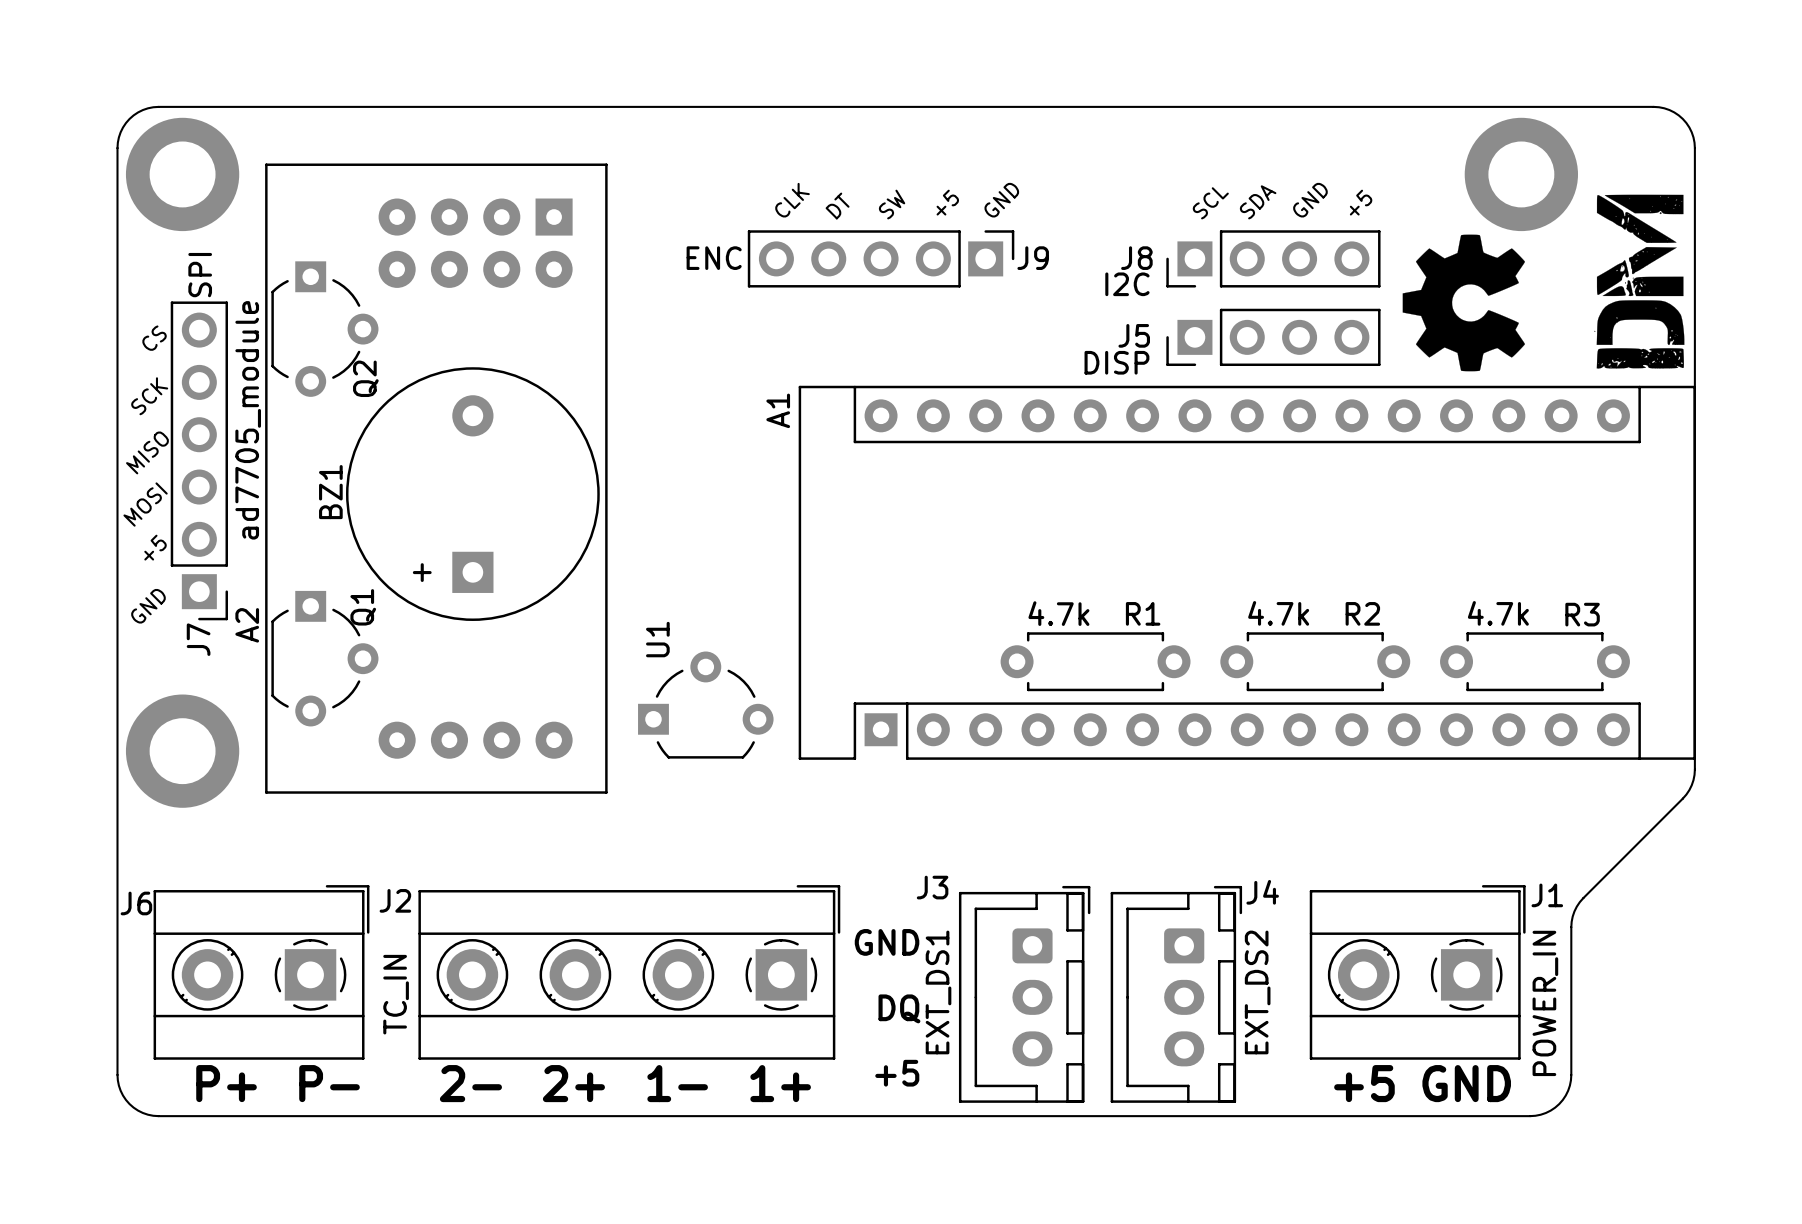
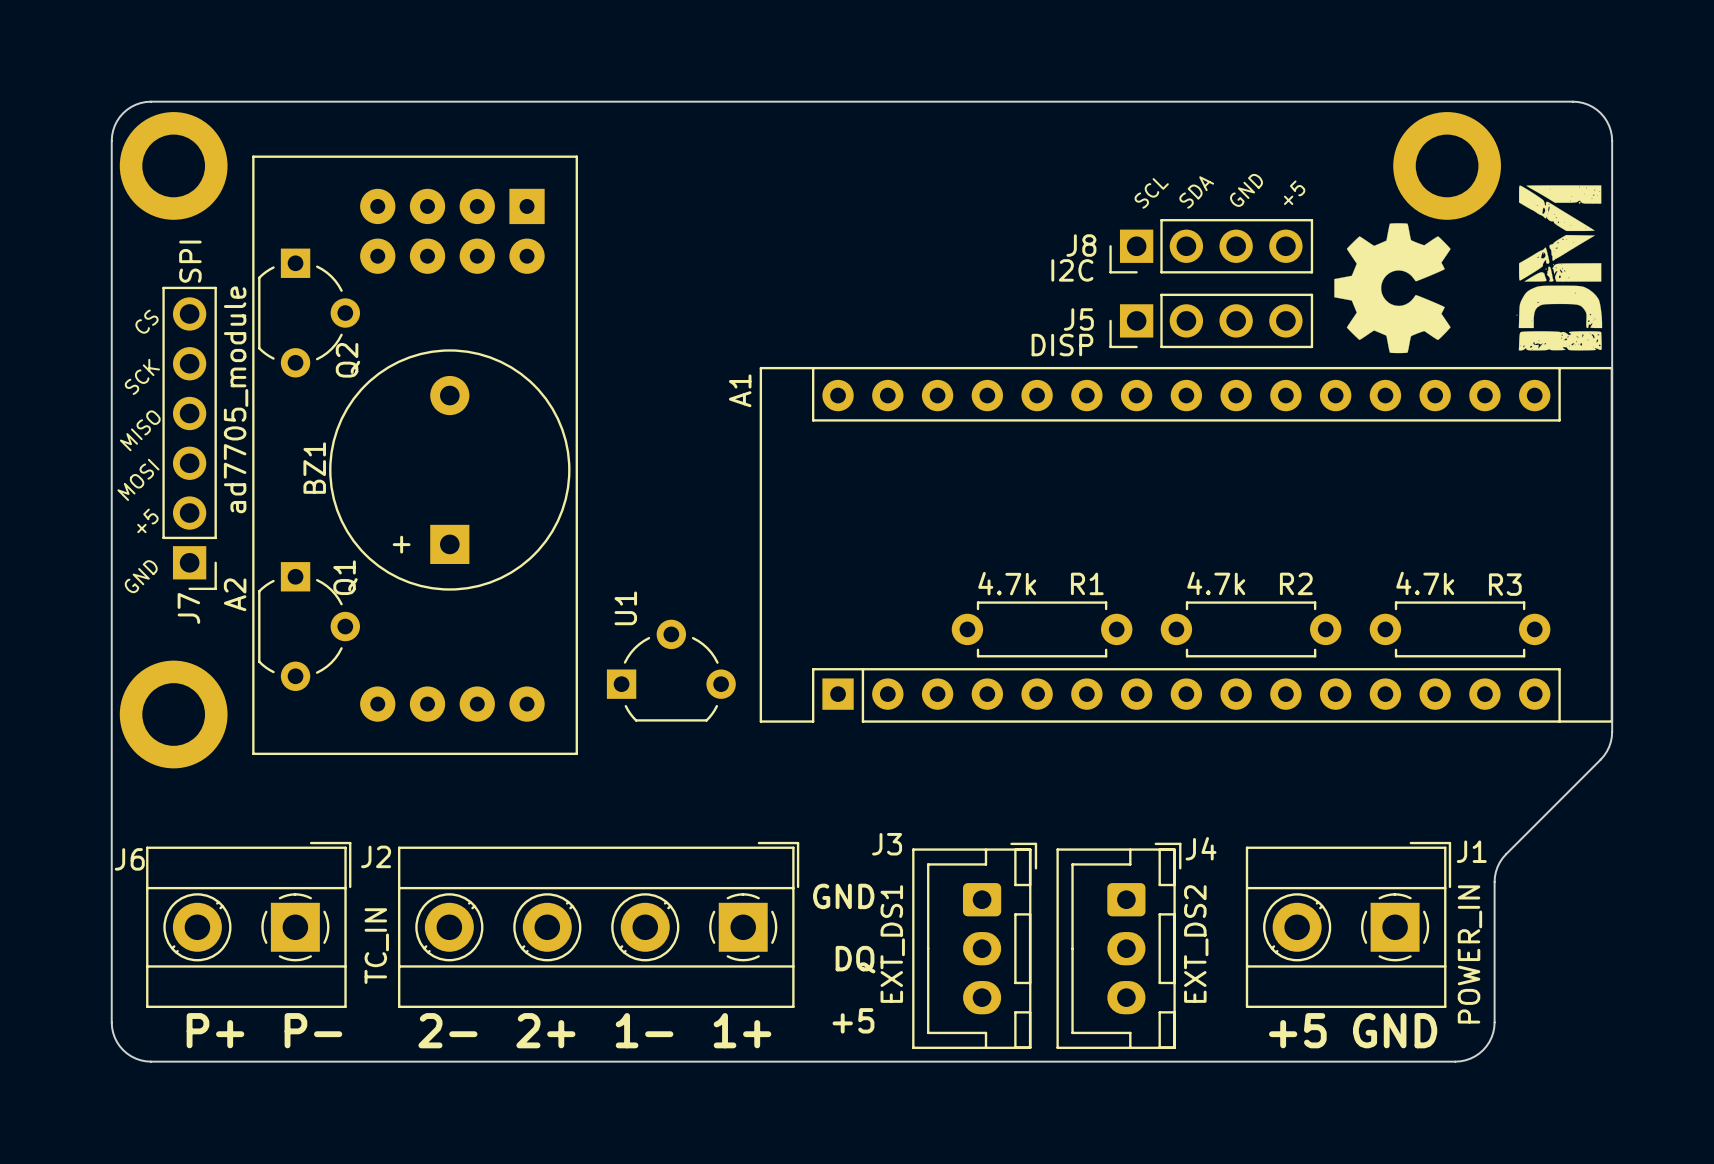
text: CLK (792, 200) -> none
text: GND (1001, 200) -> none
text: +5 (947, 202) -> none
text: SW (892, 204) -> none
text: DT (837, 206) -> none
J9: ENC (881, 258) -> none

